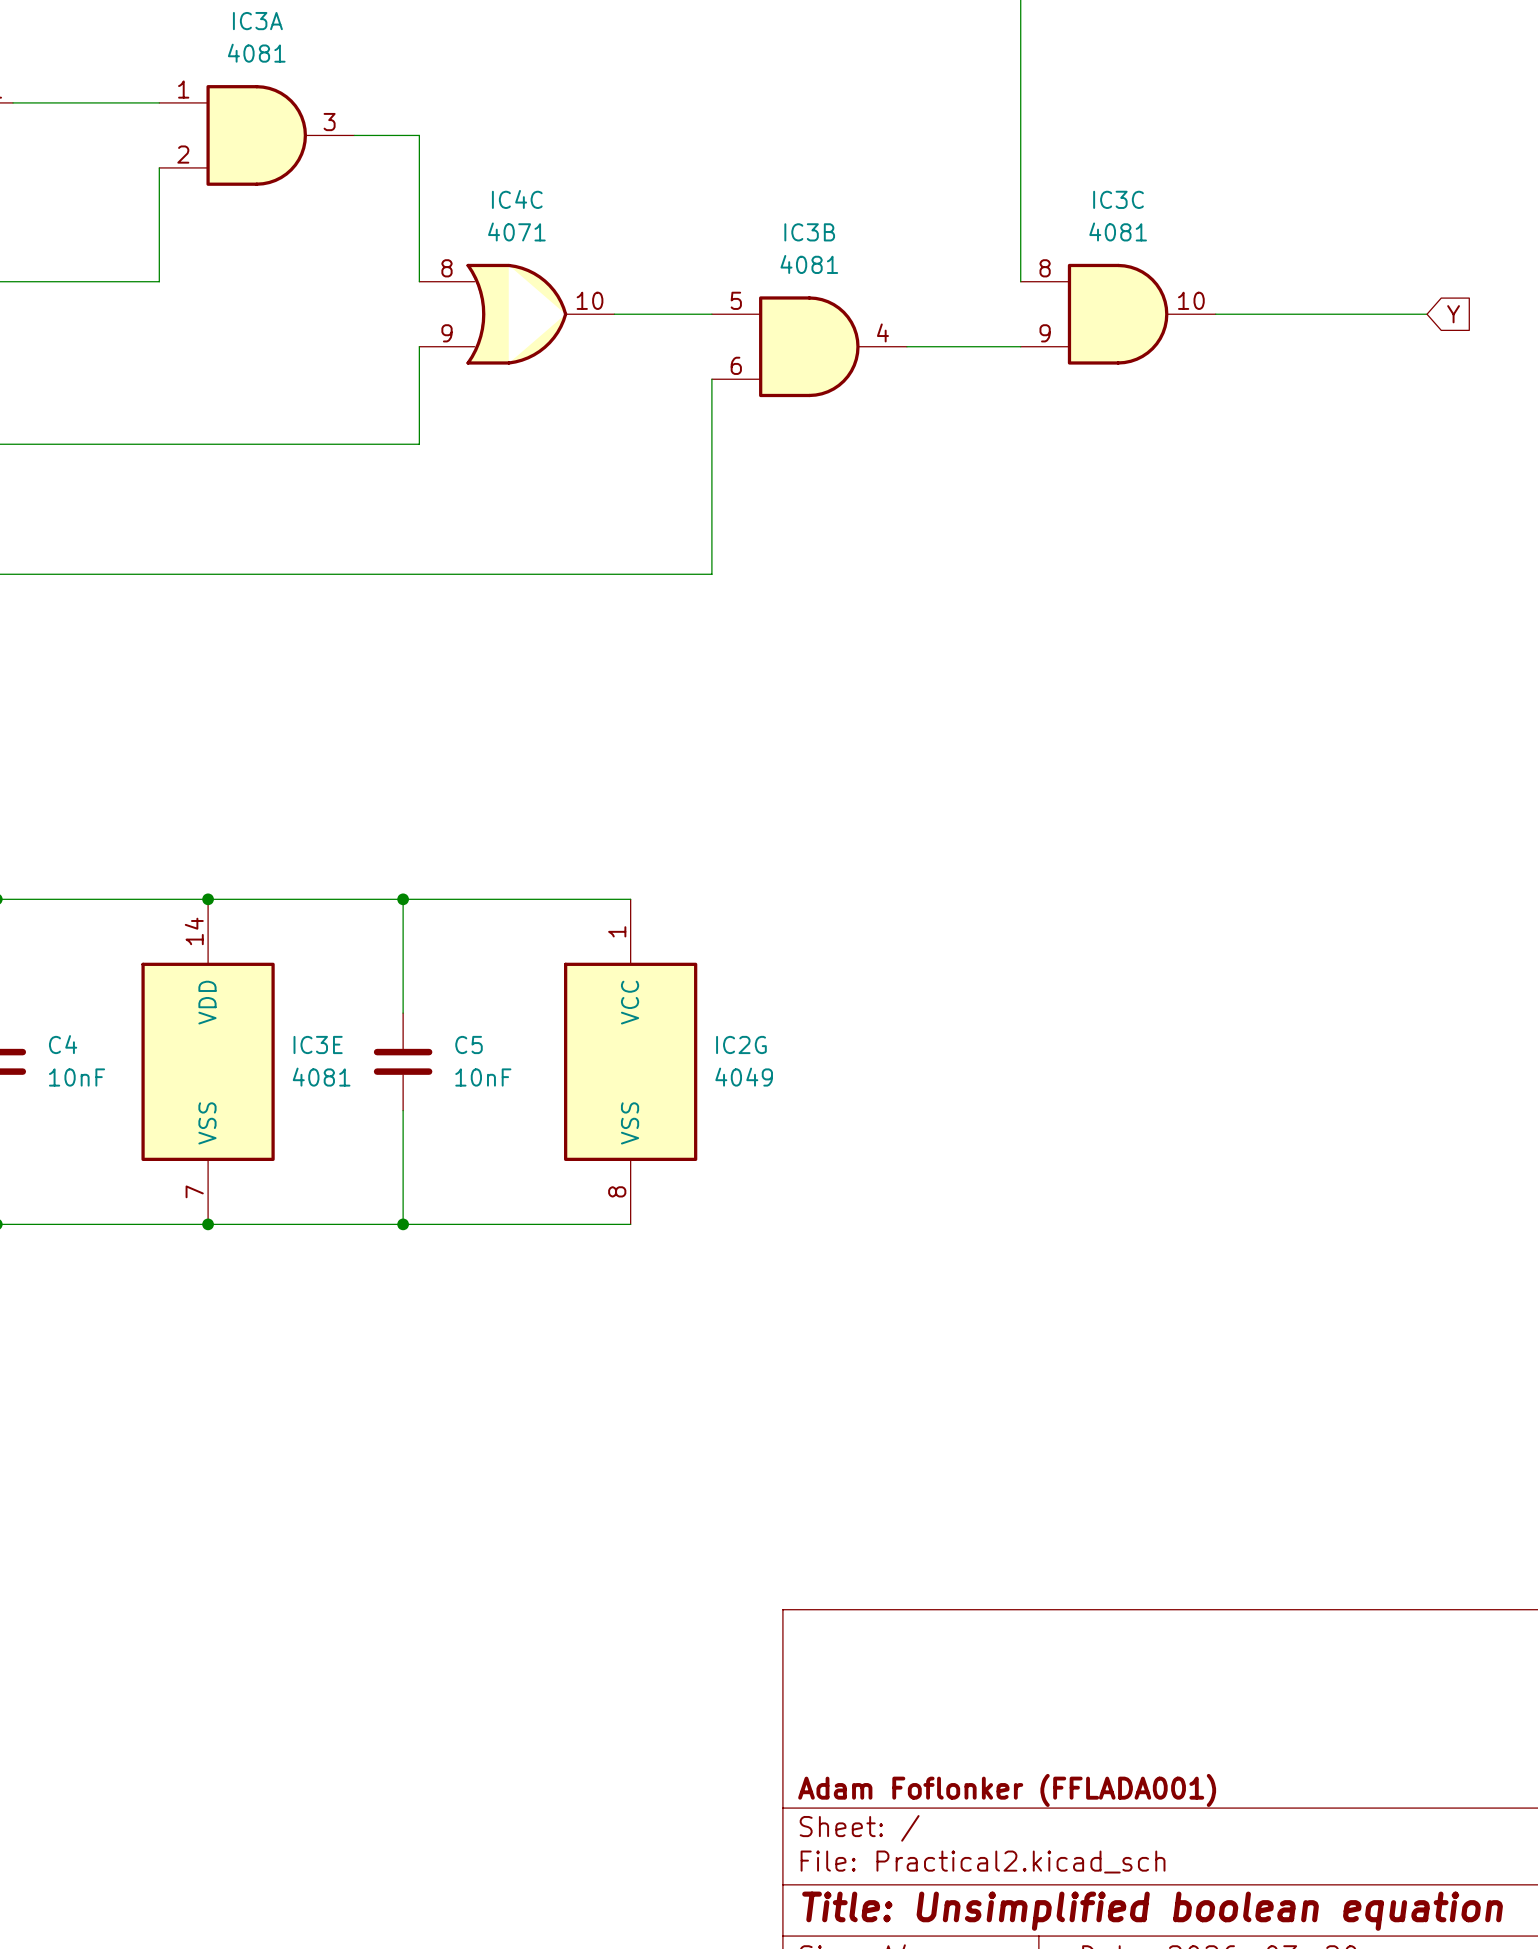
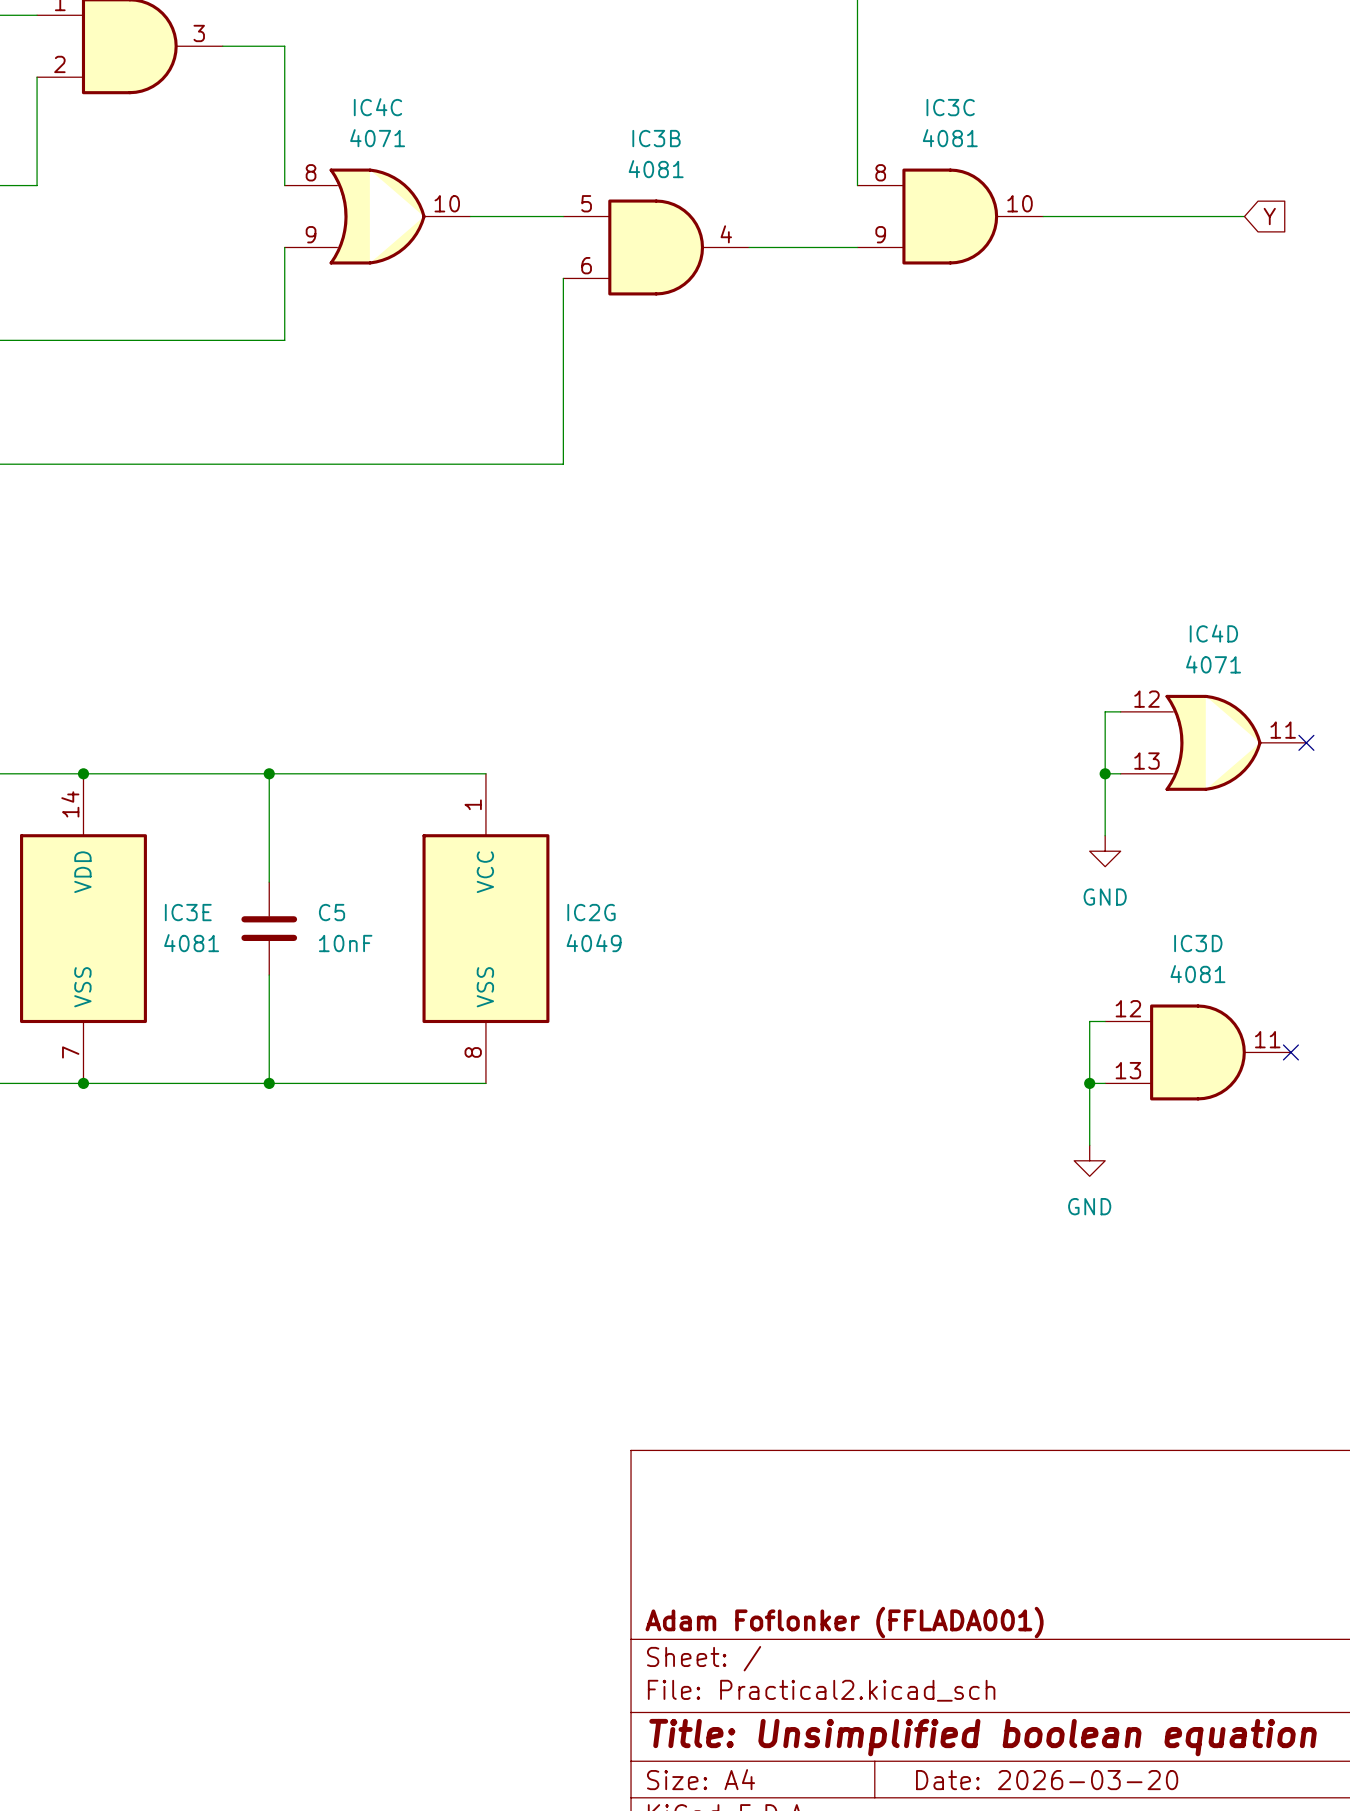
wire: none -> (1120, 711) (1105, 711) (1105, 835)
IC4D: none -> 4071 (1213, 742)
no-connect mark: none -> (1306, 742)
wire: none -> (1105, 773) (1120, 773)
junction: none -> (1105, 773)
power symbol: none -> GND (1105, 851)
wire: none -> (1105, 1021) (1089, 1021) (1089, 1145)
IC3D: none -> 4081 (1198, 1052)
no-connect mark: none -> (1290, 1052)
wire: none -> (1089, 1083) (1105, 1083)
junction: none -> (1089, 1083)
power symbol: none -> GND (1089, 1160)

